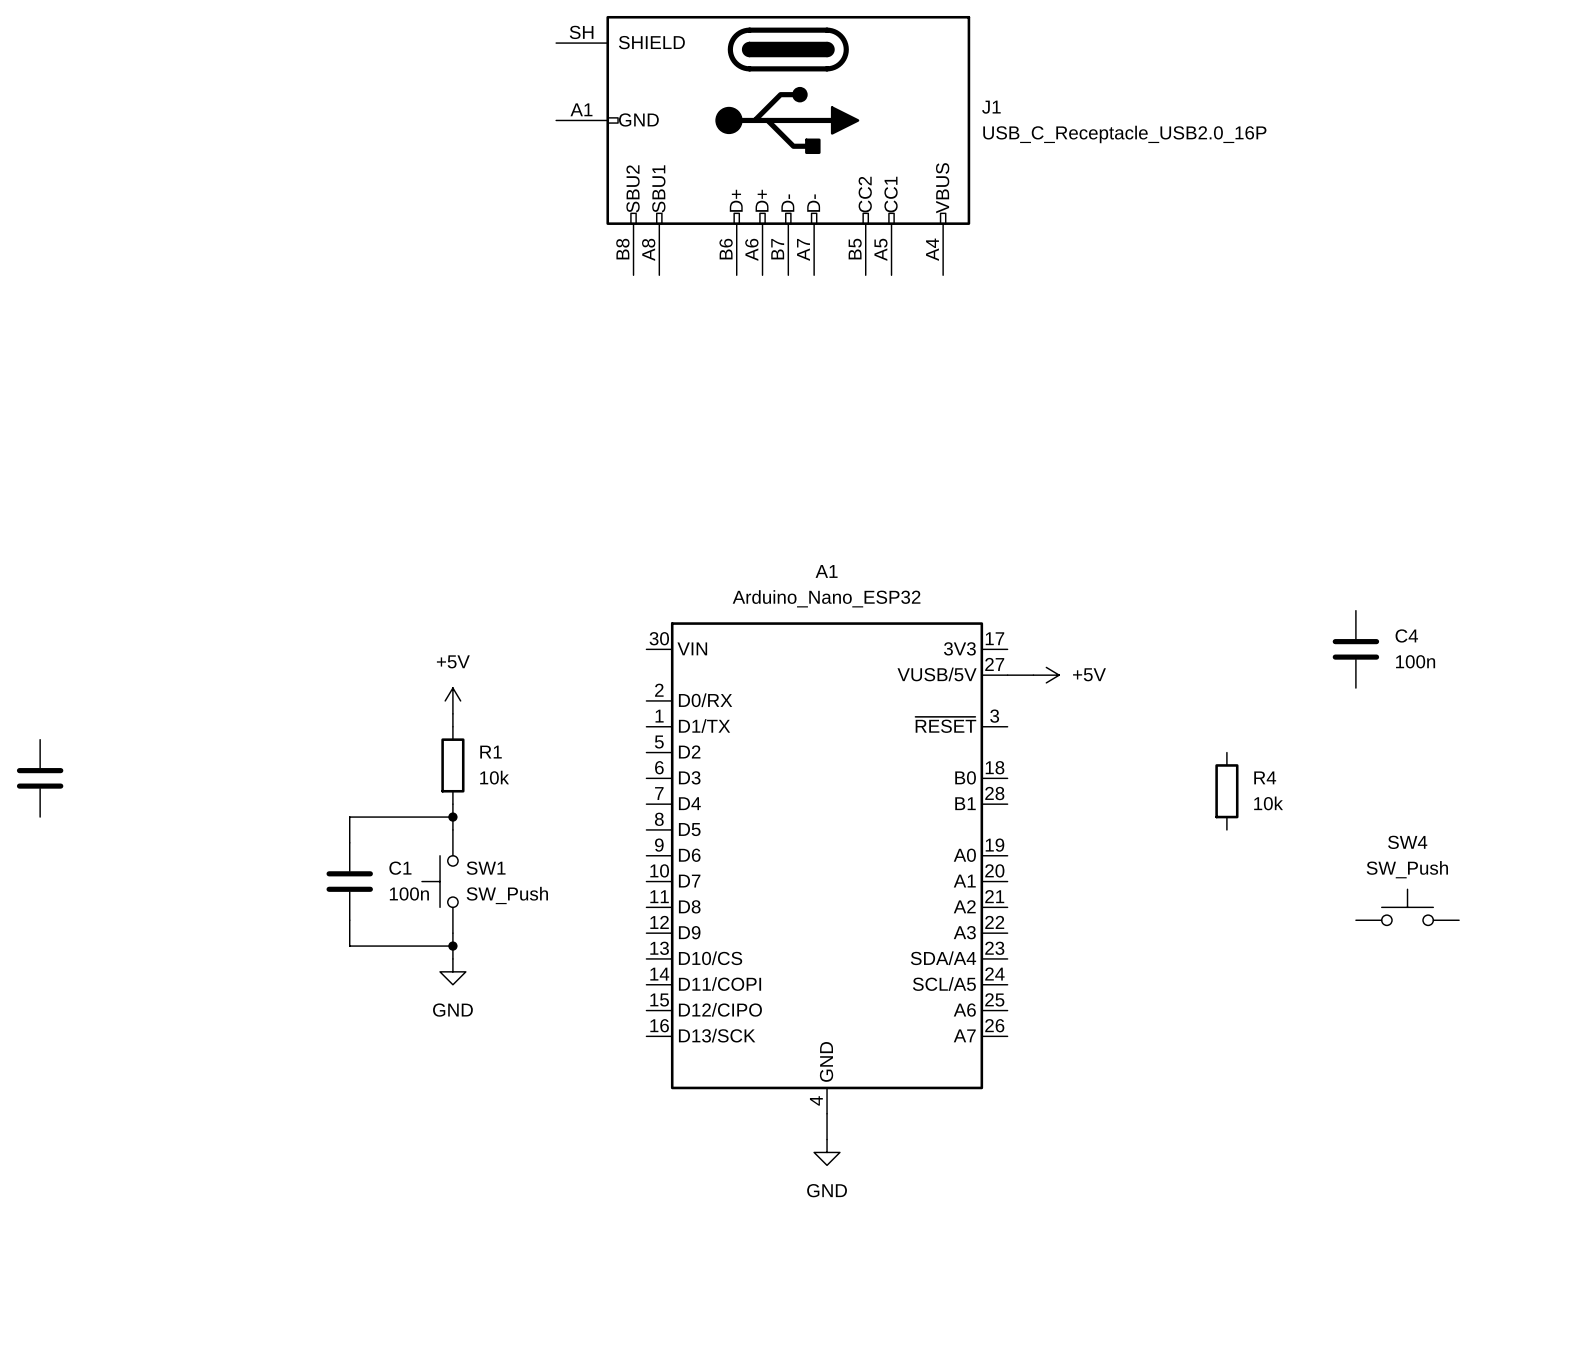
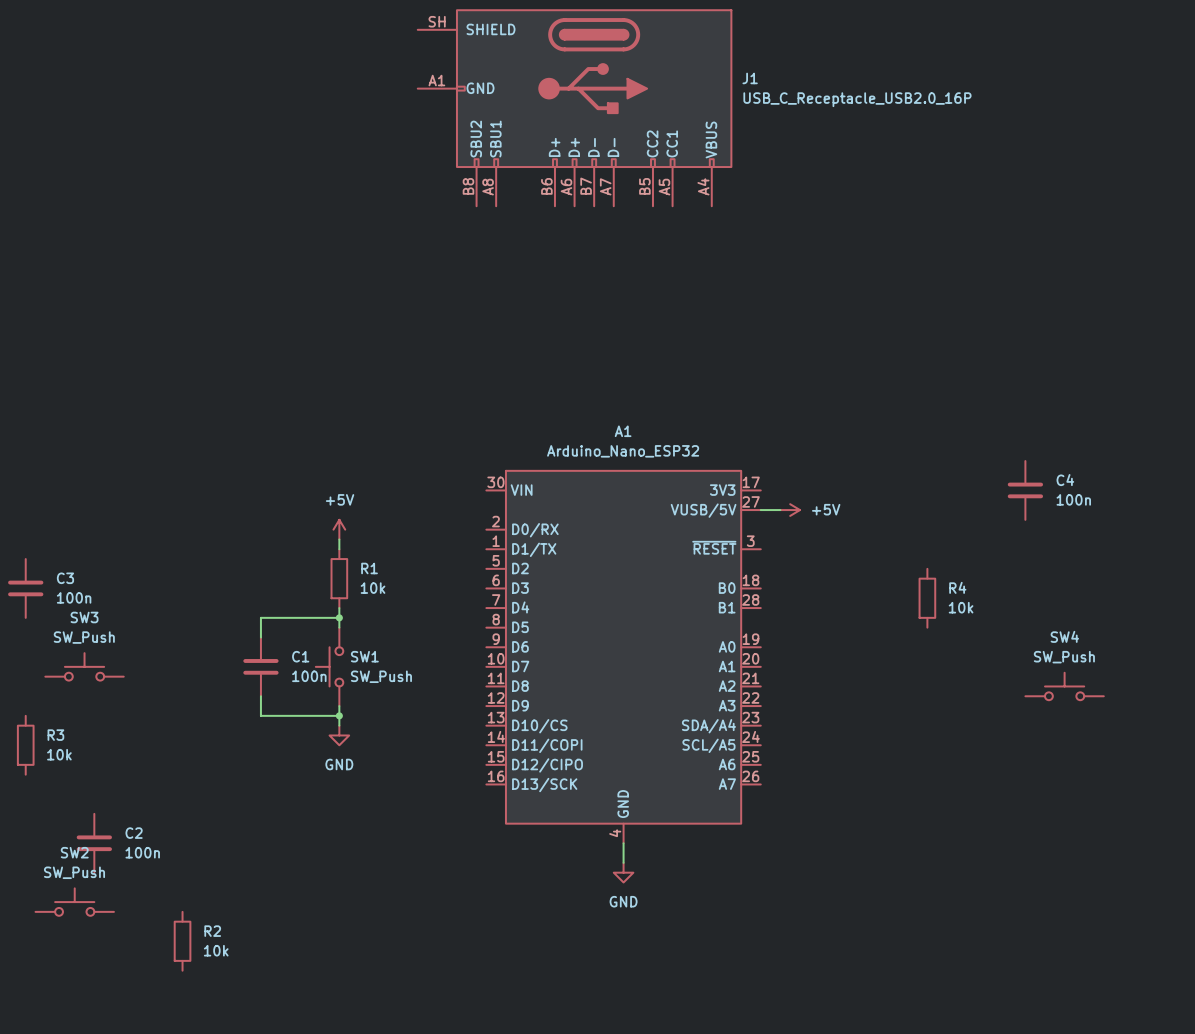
C3 name: none -> C3 (65, 578)
C3 value: none -> 100n (74, 597)
SW3: none -> SW_Push (84, 666)
R3: none -> 10k (25, 745)
C2: none -> 100n (94, 843)
SW2: none -> SW_Push (74, 902)
R2: none -> 10k (182, 941)

